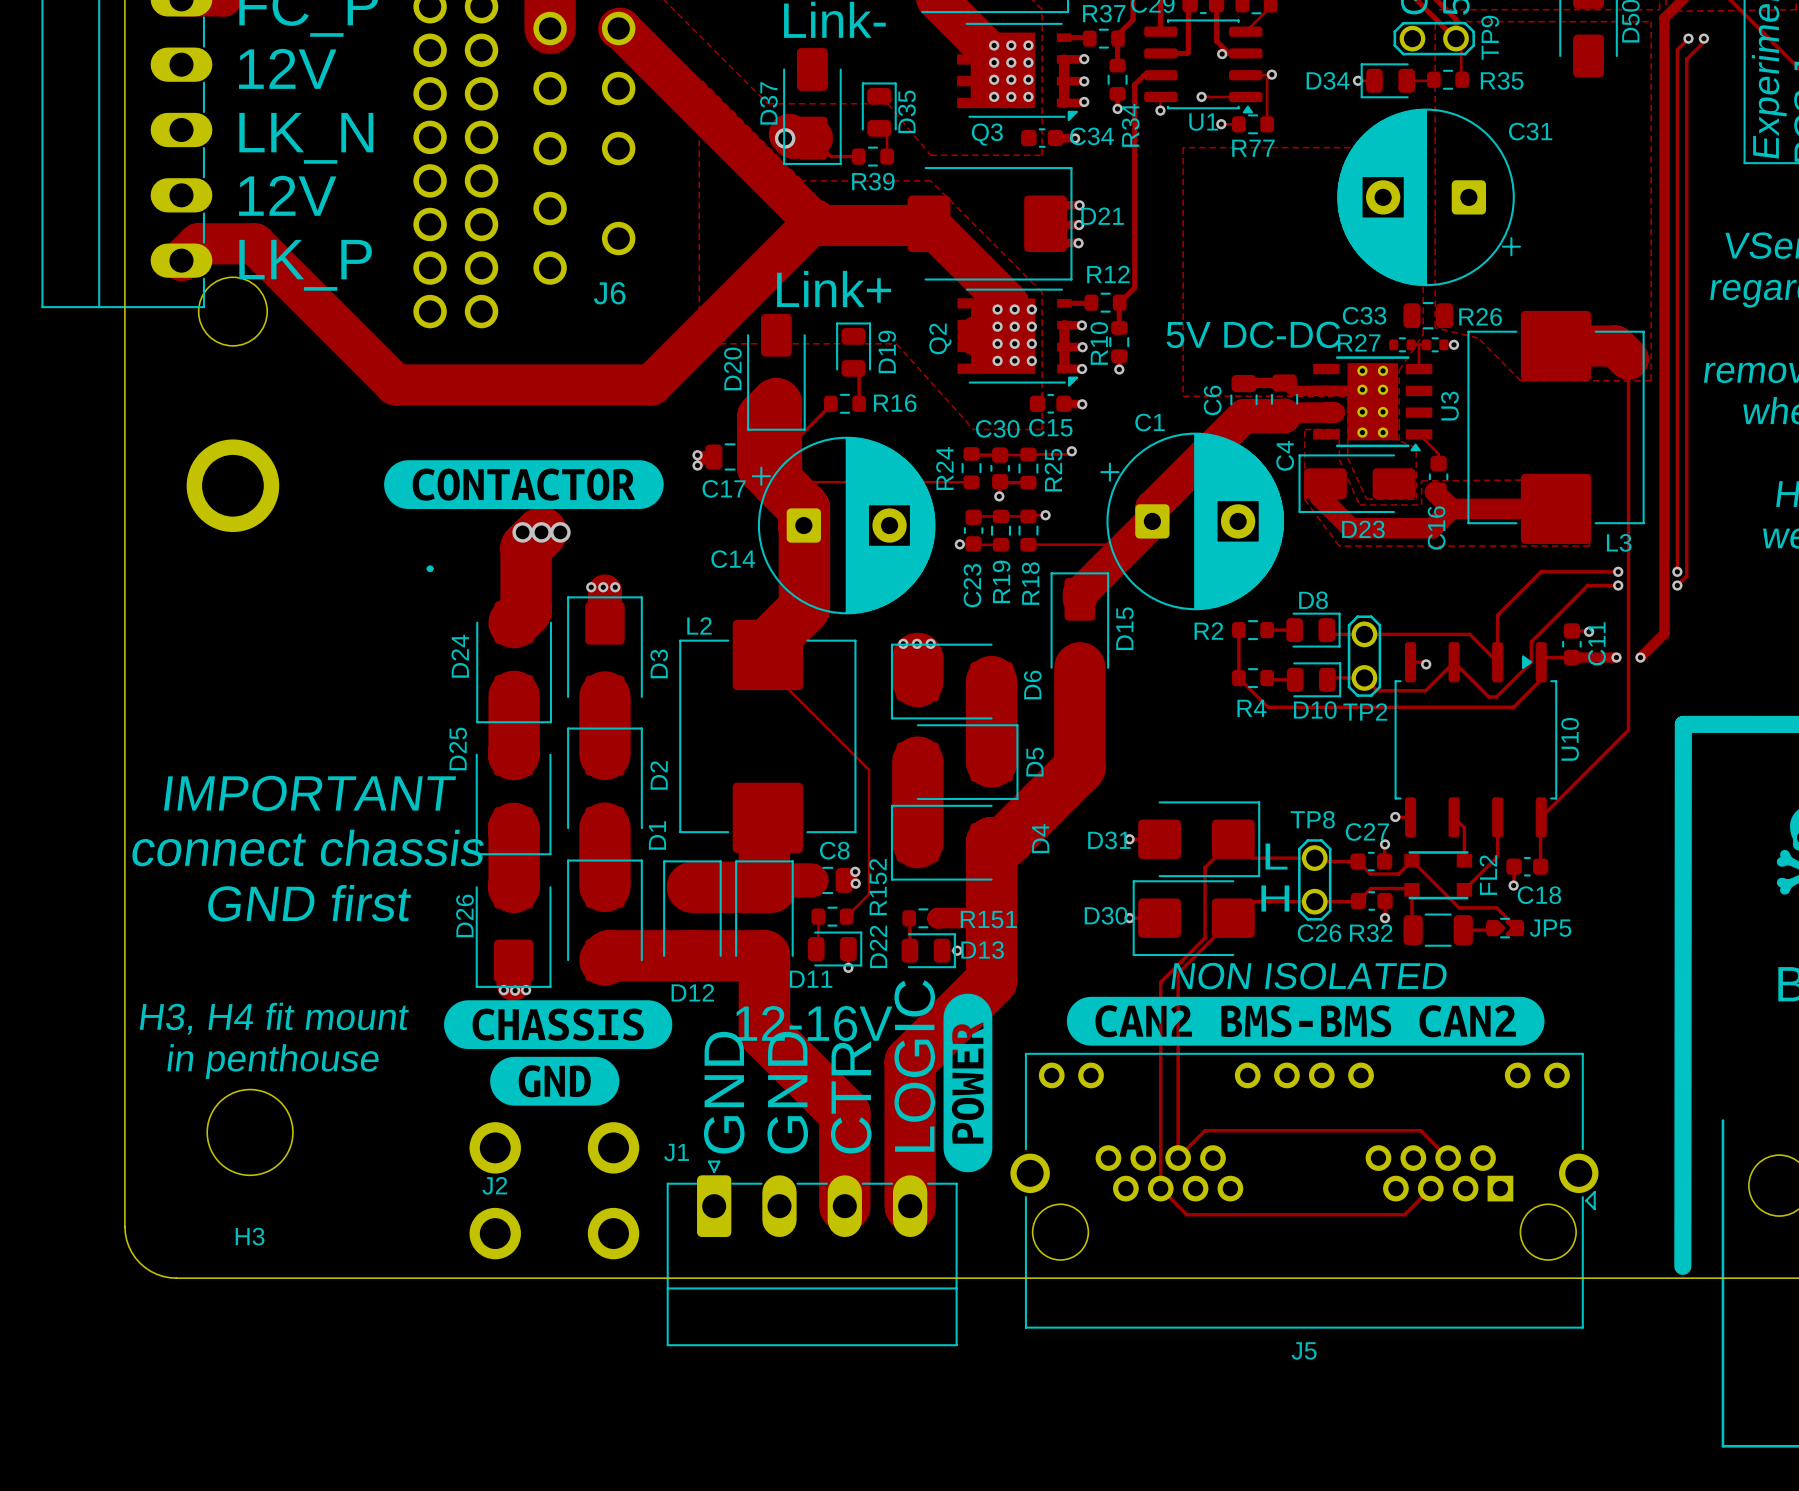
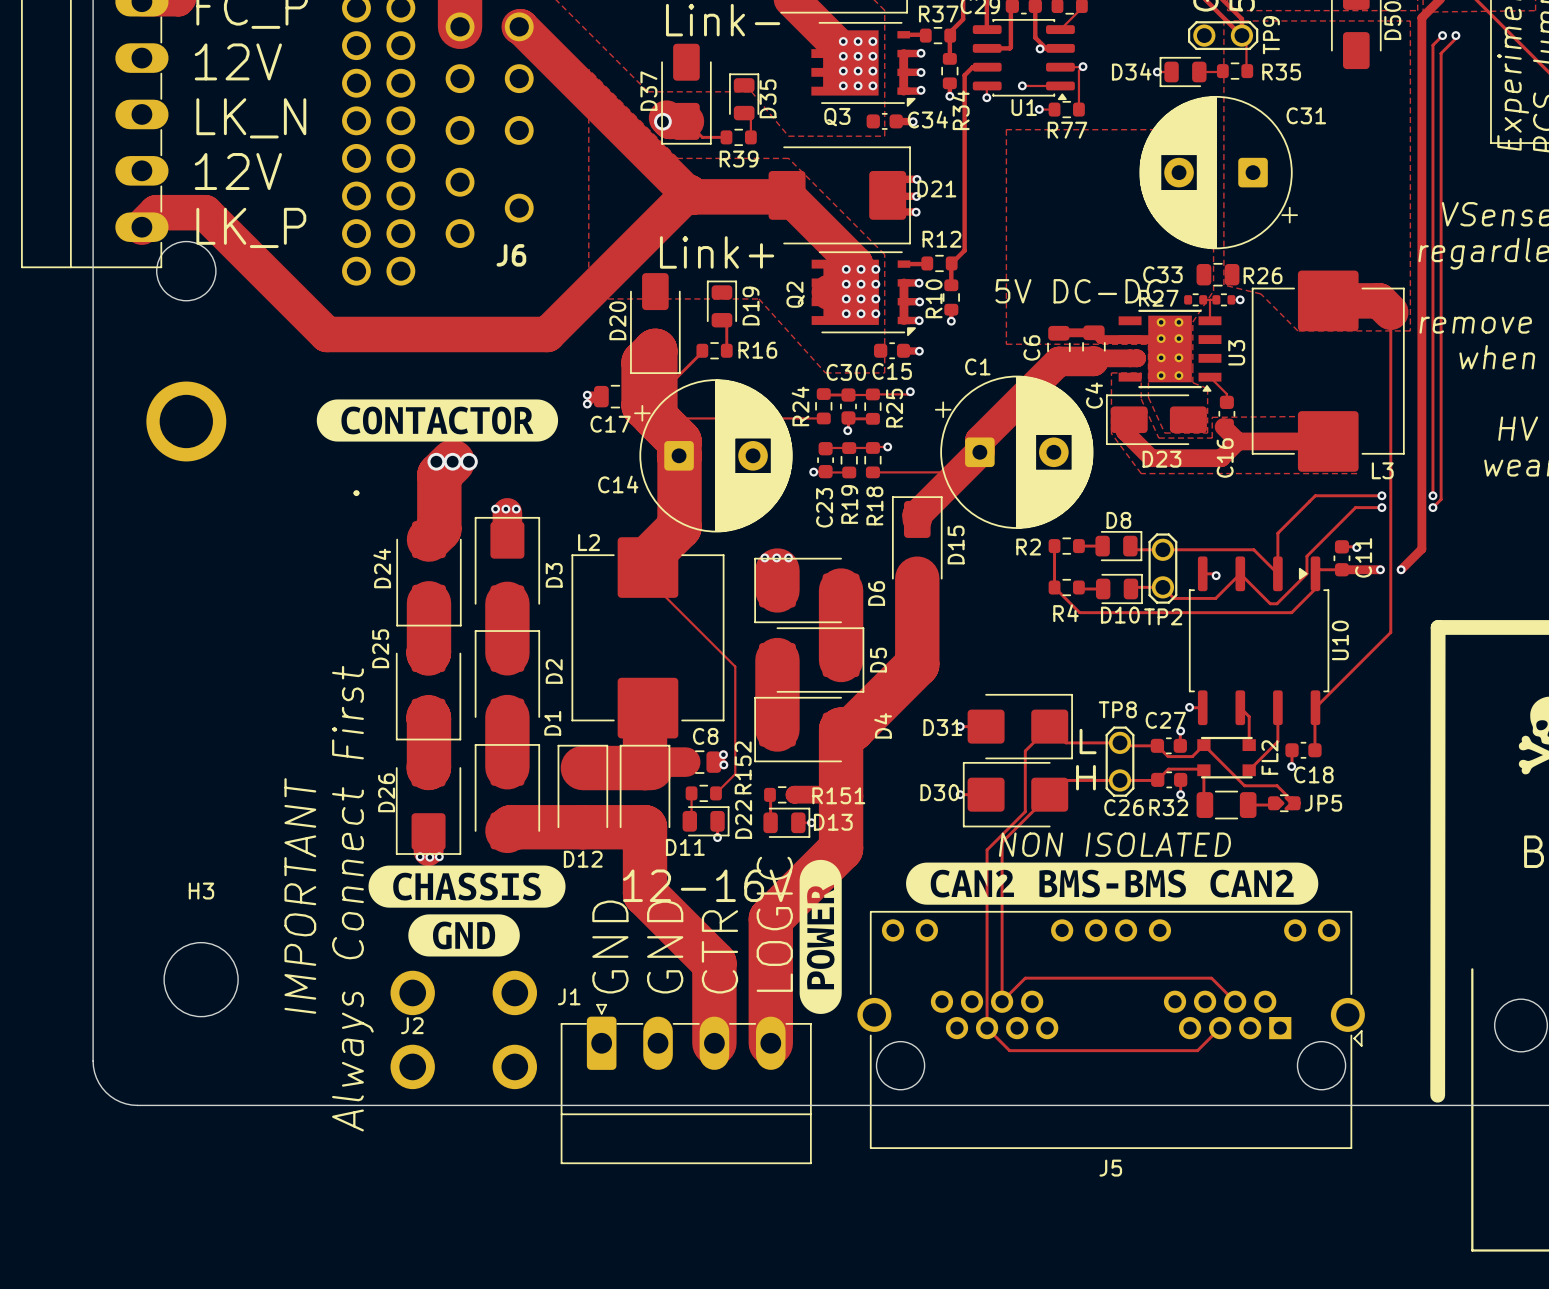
text rotation: 0° (310, 793) -> 90° counterclockwise (300, 895)
text: connect chassis (307, 848) -> none
text: GND first (309, 903) -> none
text: H3, H4 fit mount (274, 1018) -> none
text: none -> Always Connect First (352, 898)
text: in penthouse (273, 1061) -> none
H3 name position: H3 (250, 1236) -> H3 (201, 891)

